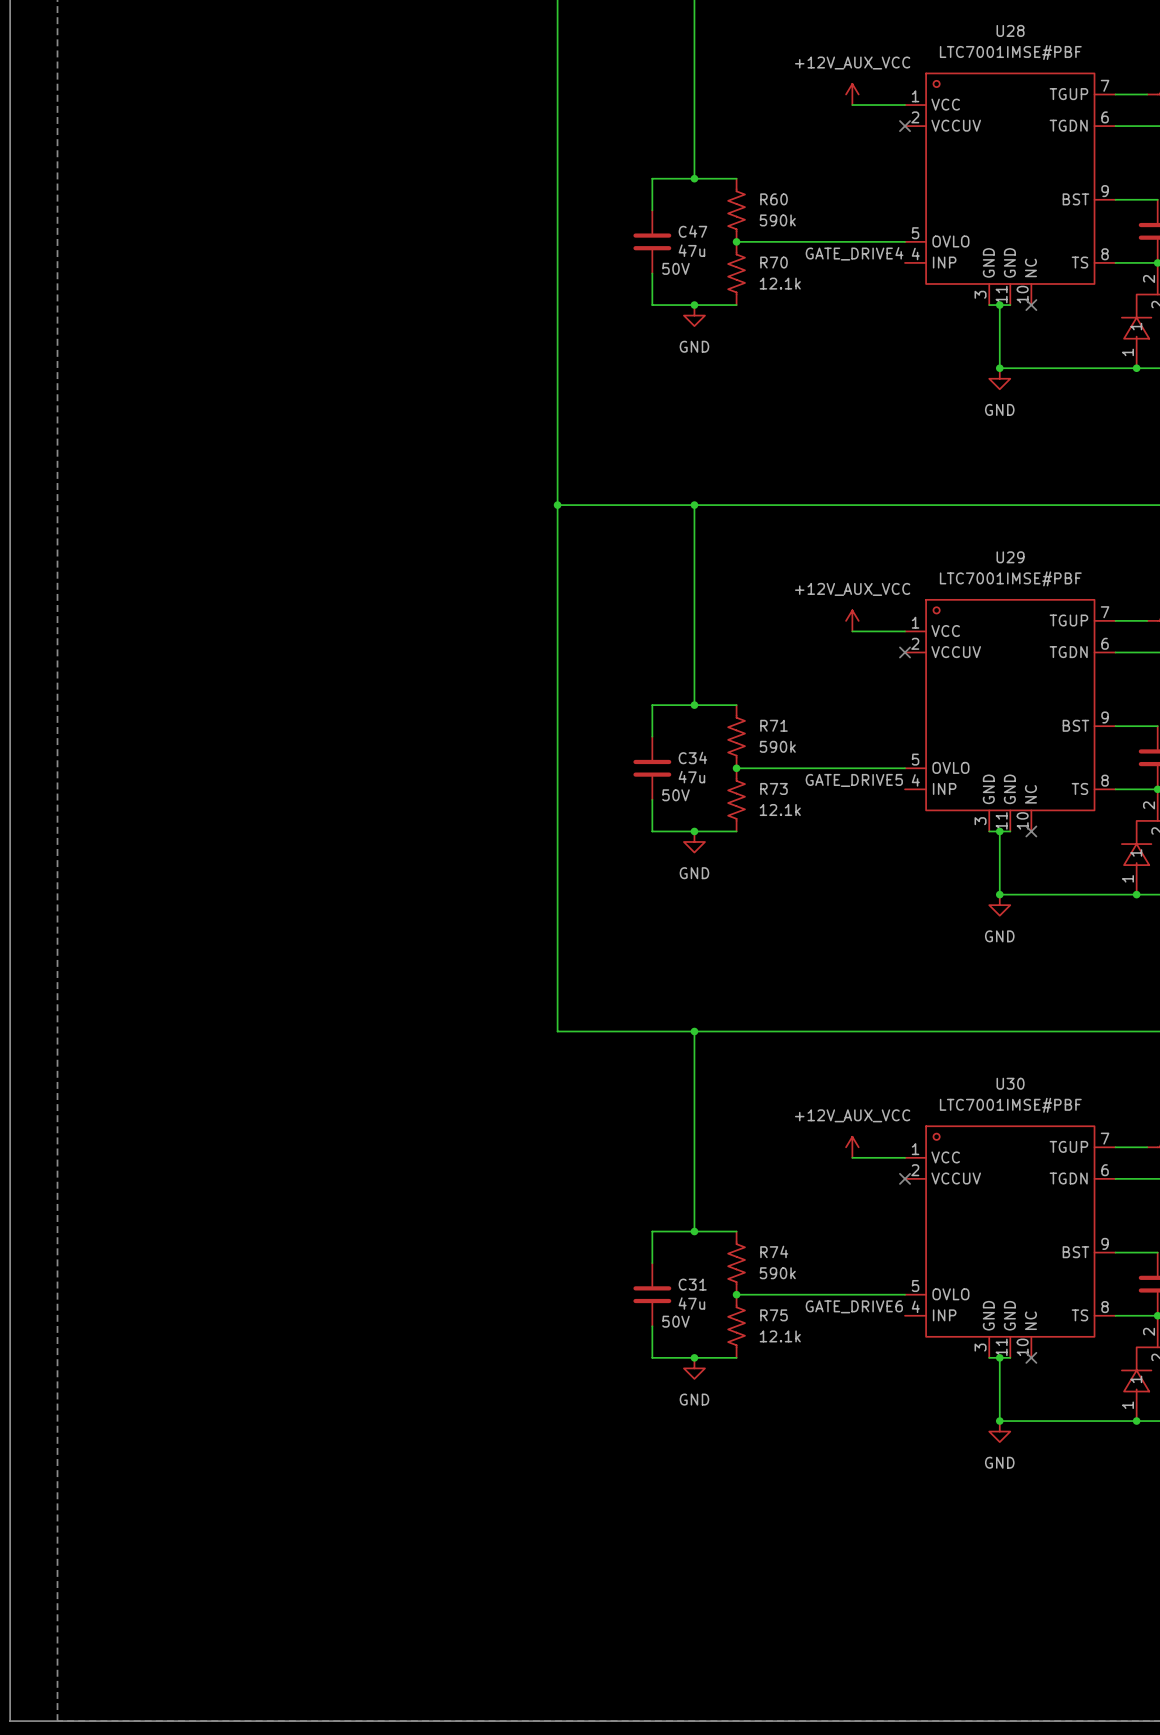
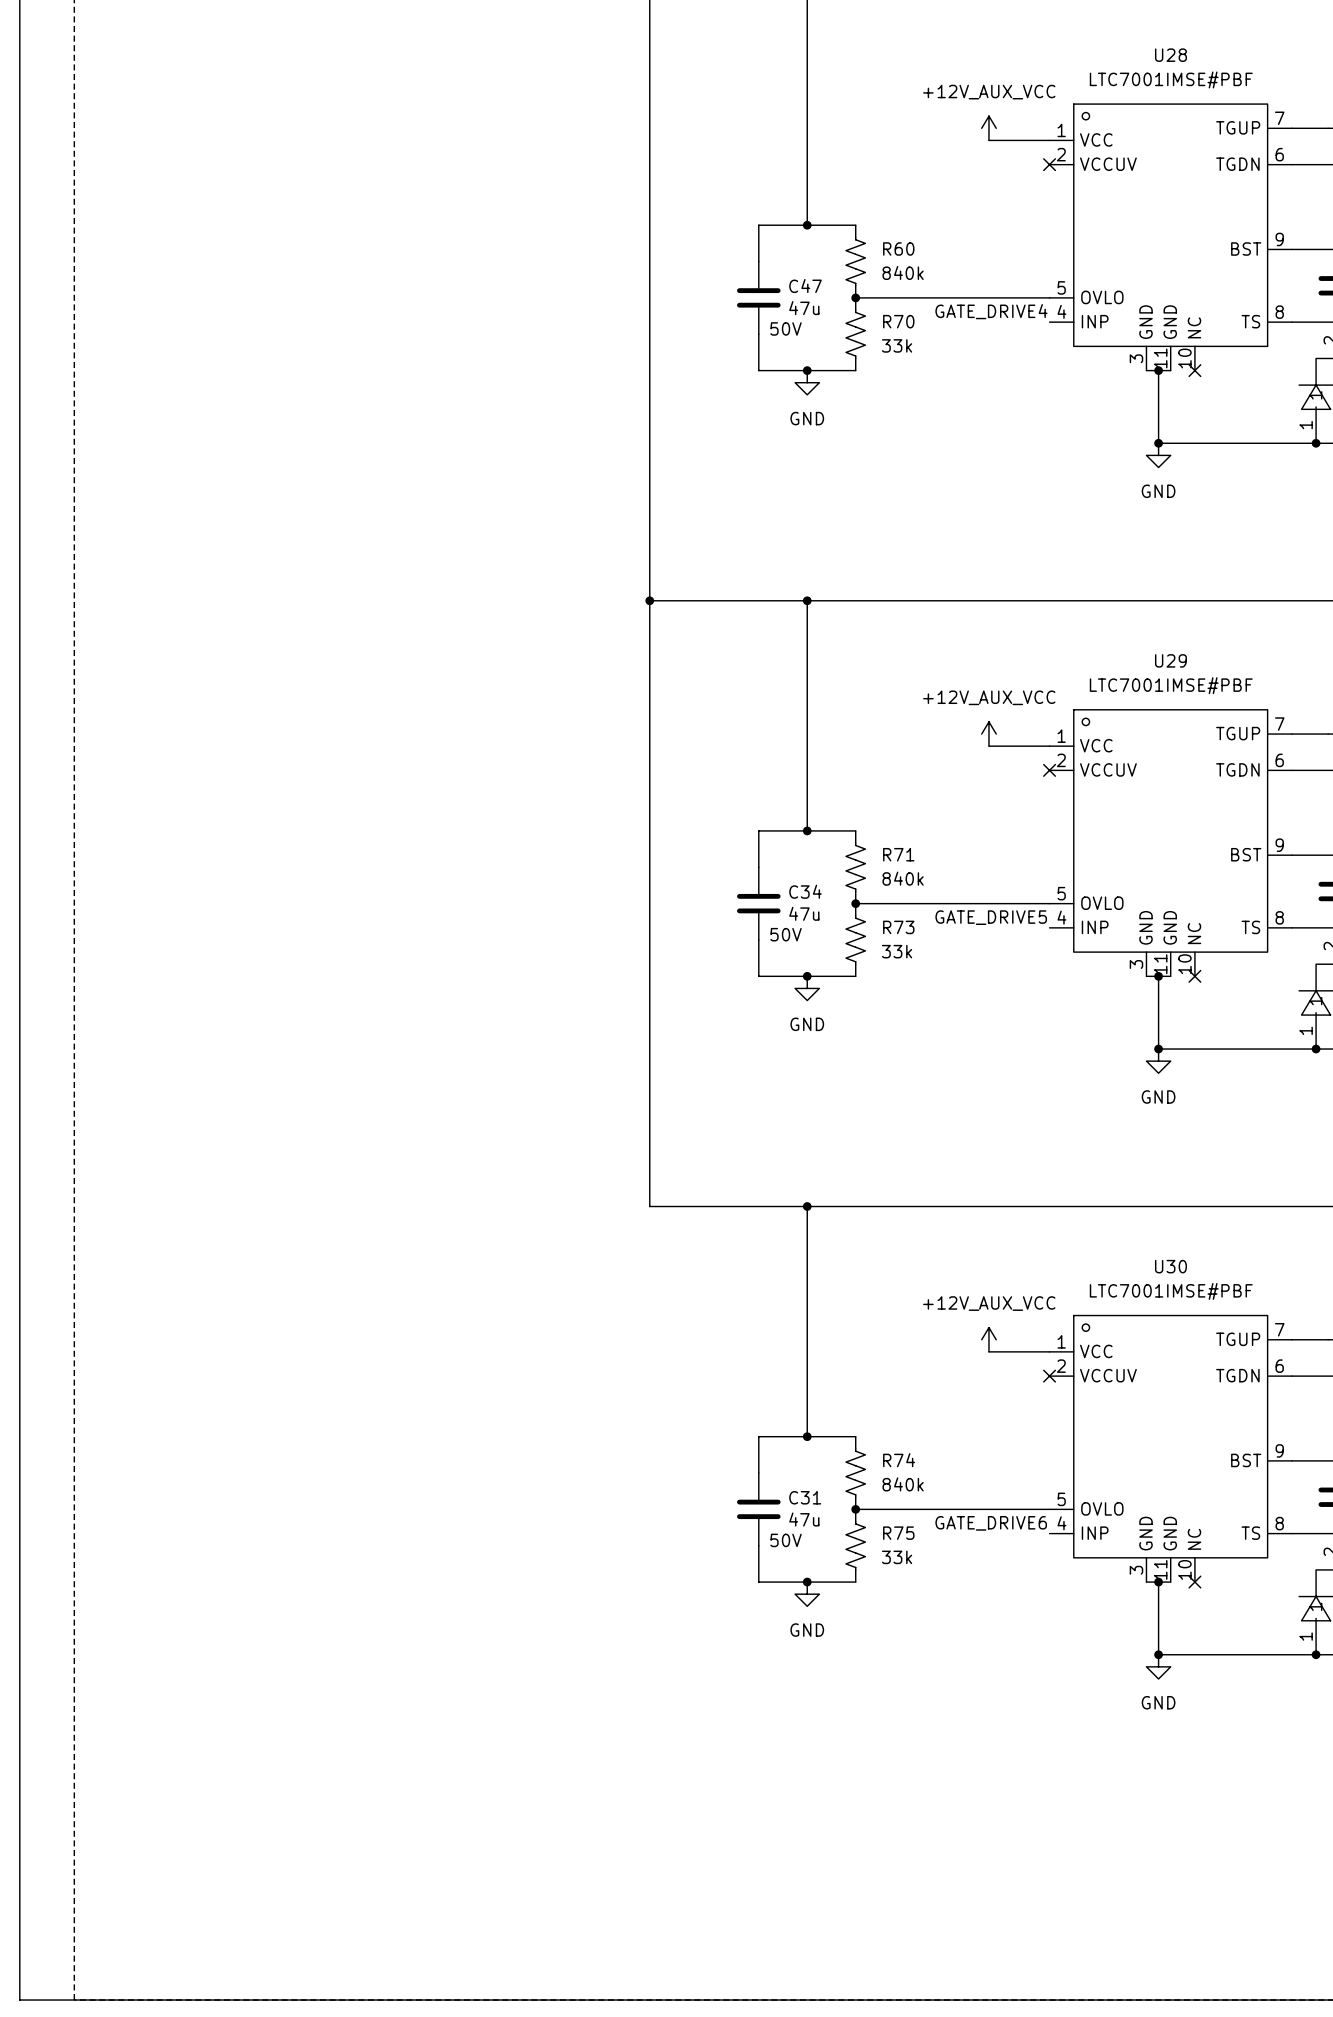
R60 value: 590k (777, 220) -> 840k (903, 272)
R70 value: 12.1k (780, 283) -> 33k (897, 345)
R71 value: 590k (777, 746) -> 840k (903, 878)
R73 value: 12.1k (780, 810) -> 33k (897, 951)
R74 value: 590k (777, 1273) -> 840k (903, 1484)
R75 value: 12.1k (780, 1336) -> 33k (897, 1557)

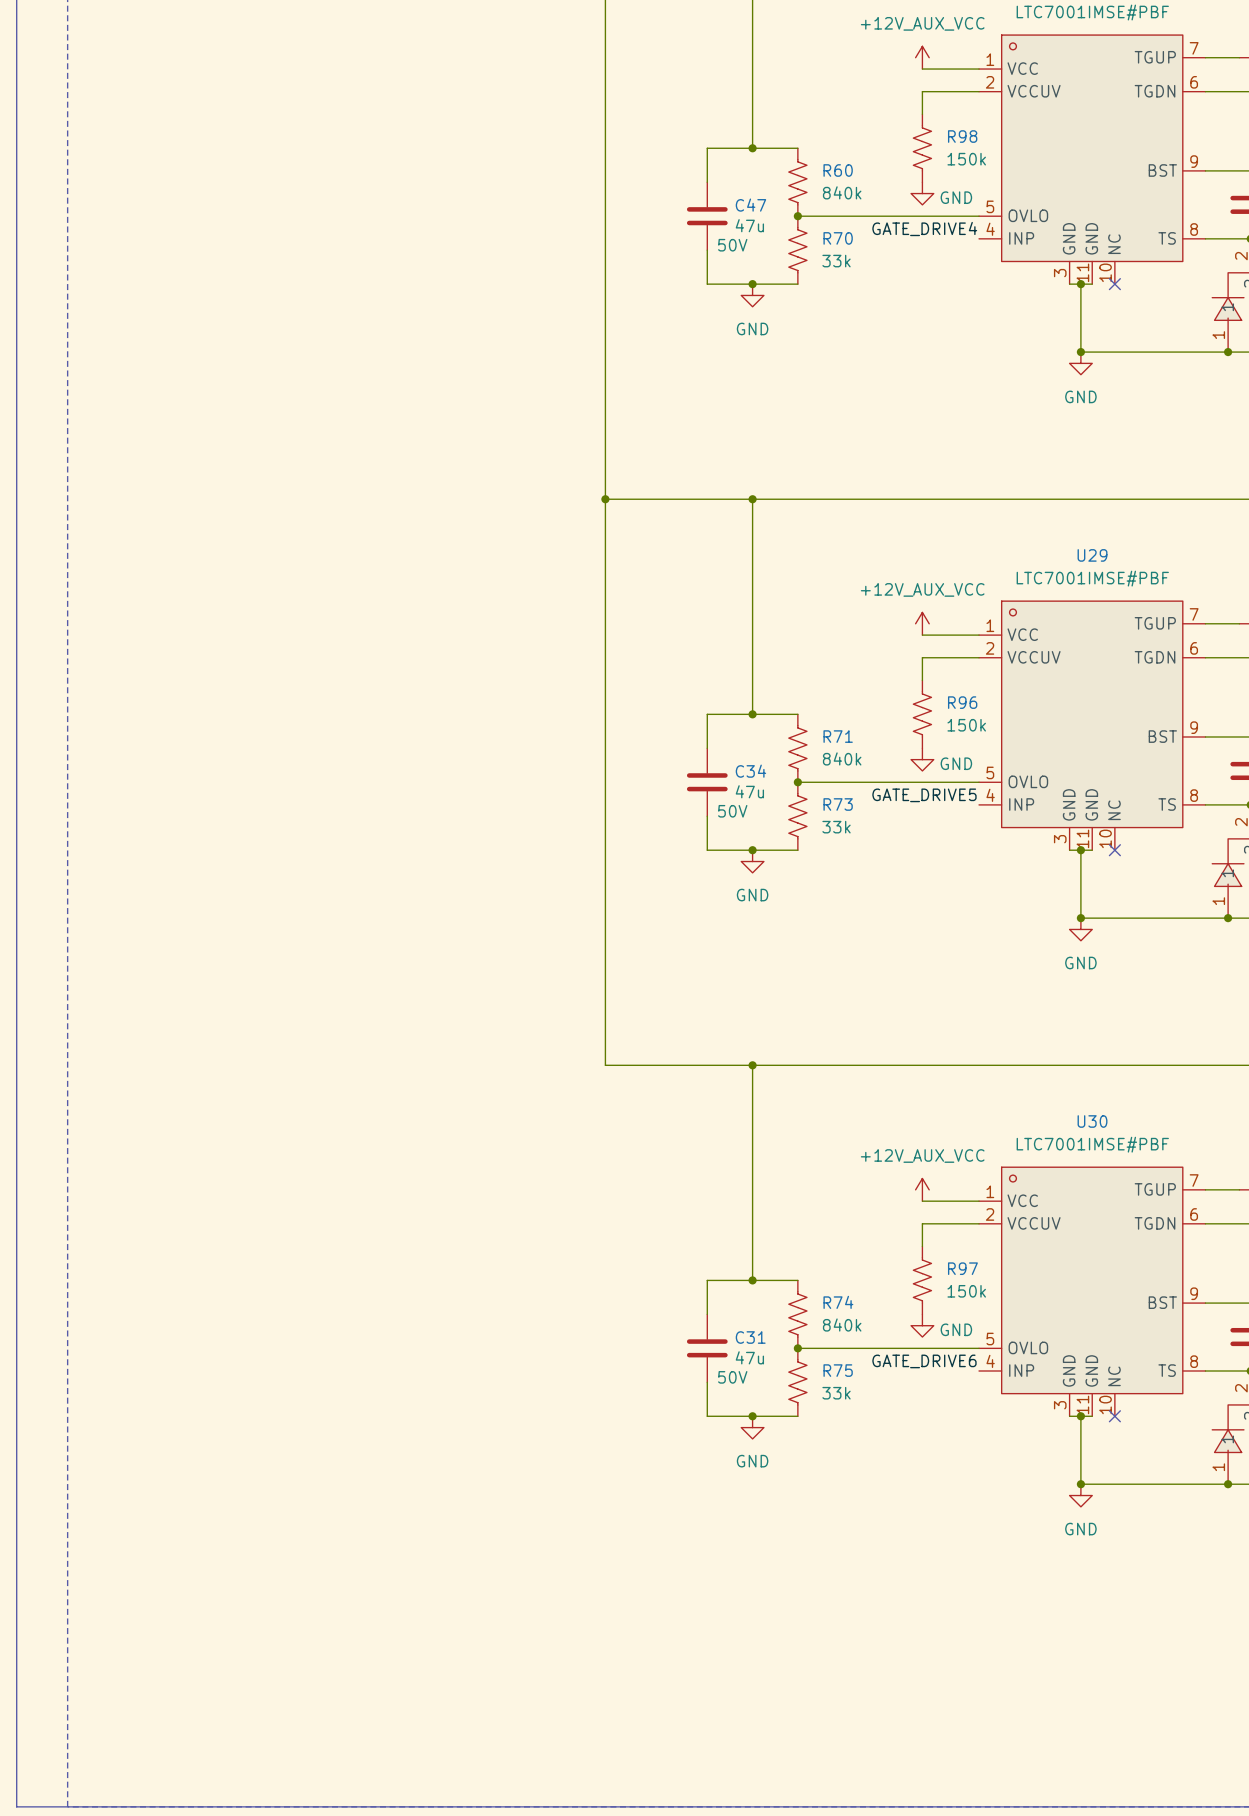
wire: none -> (979, 91) (922, 91) (922, 114)
no-connect mark: (1049, 164) -> none
R98: none -> 150k (922, 148)
power symbol: none -> GND (922, 193)
wire: none -> (979, 657) (922, 657) (922, 680)
no-connect mark: (1049, 770) -> none
R96: none -> 150k (922, 714)
power symbol: none -> GND (922, 759)
wire: none -> (979, 1223) (922, 1223) (922, 1246)
no-connect mark: (1049, 1376) -> none
R97: none -> 150k (922, 1280)
power symbol: none -> GND (922, 1325)

